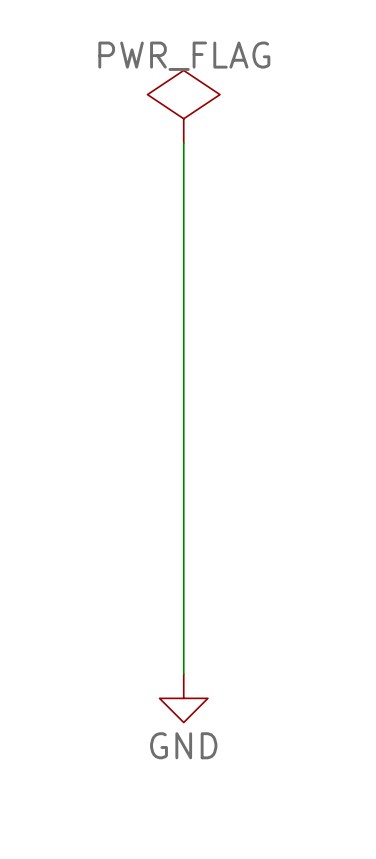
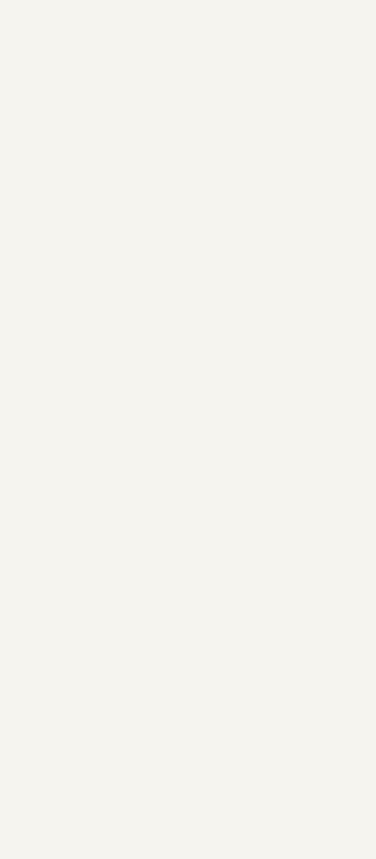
power symbol: PWR_FLAG (183, 106) -> none
wire: (183, 142) (183, 674) -> none
power symbol: GND (183, 698) -> none

